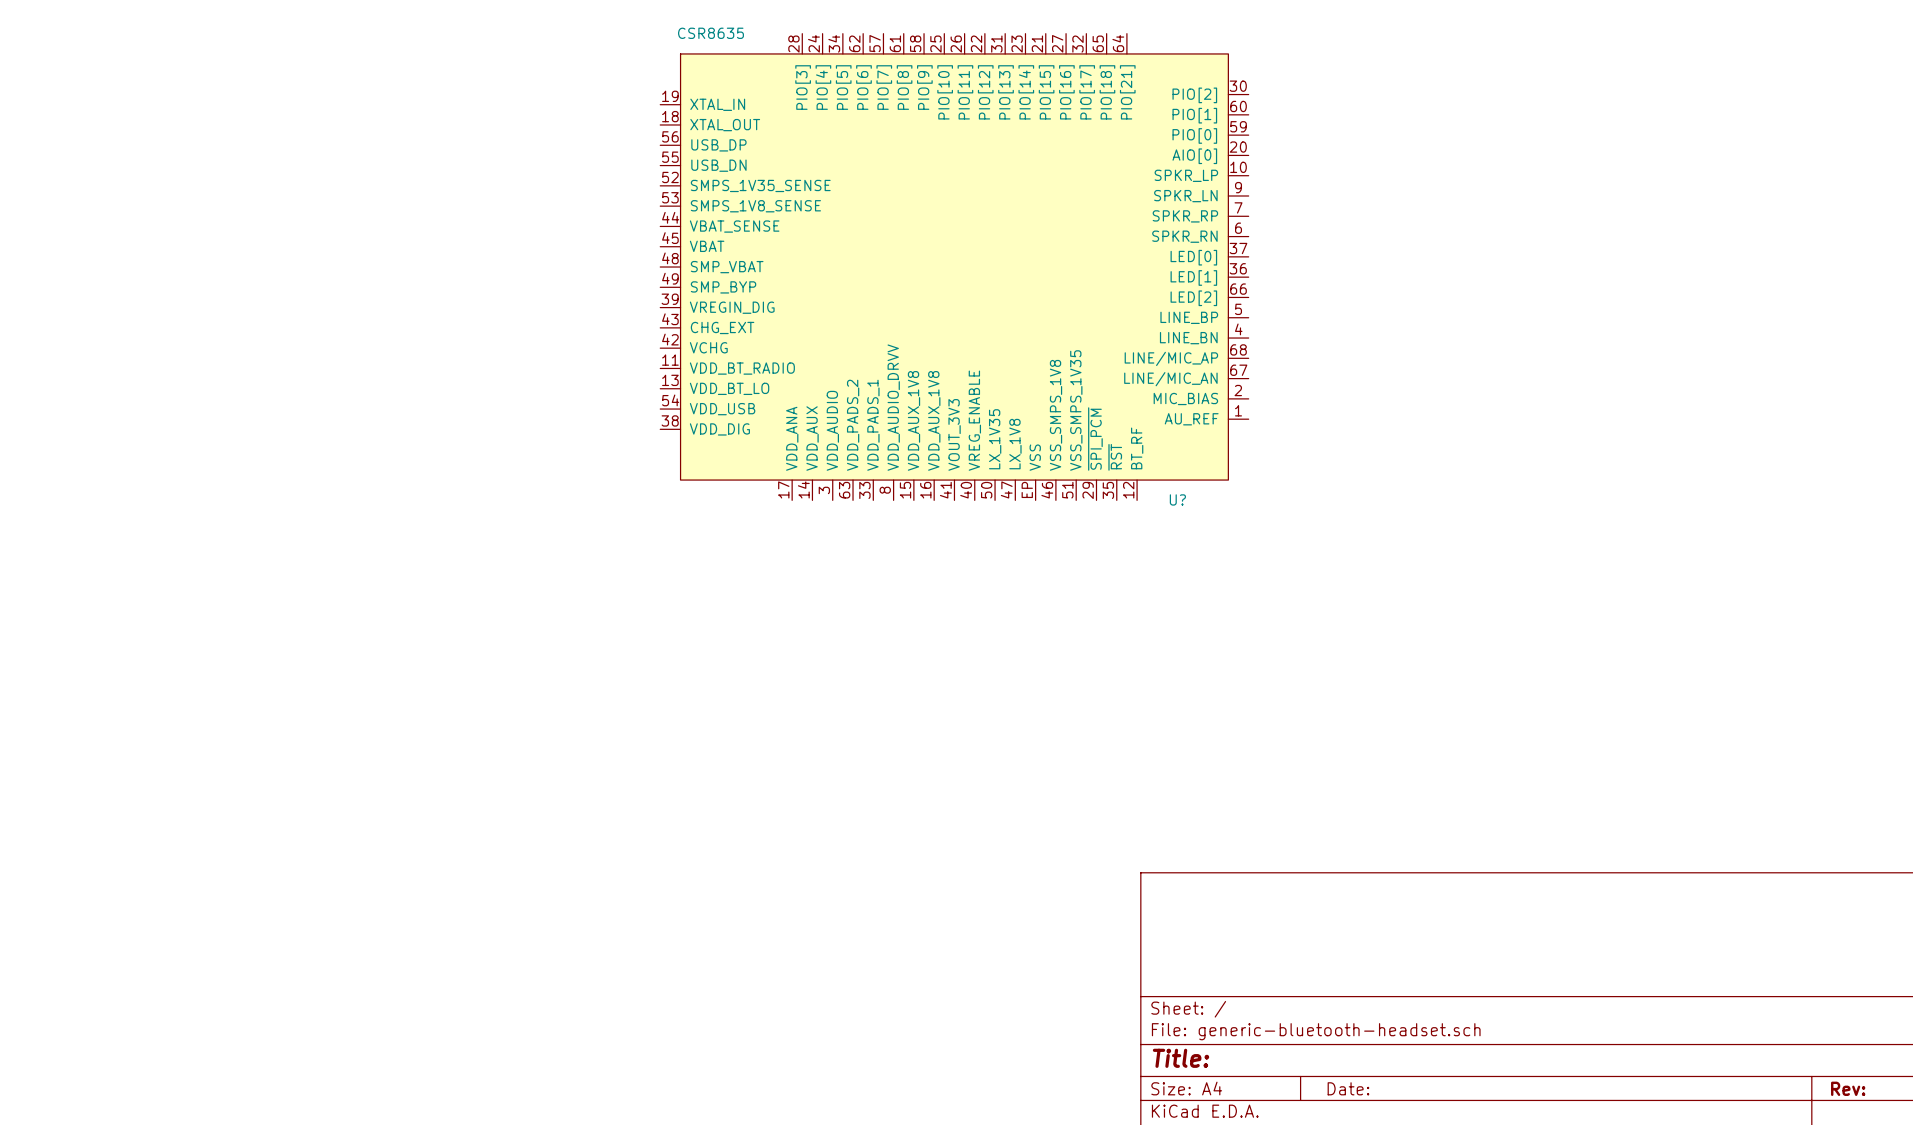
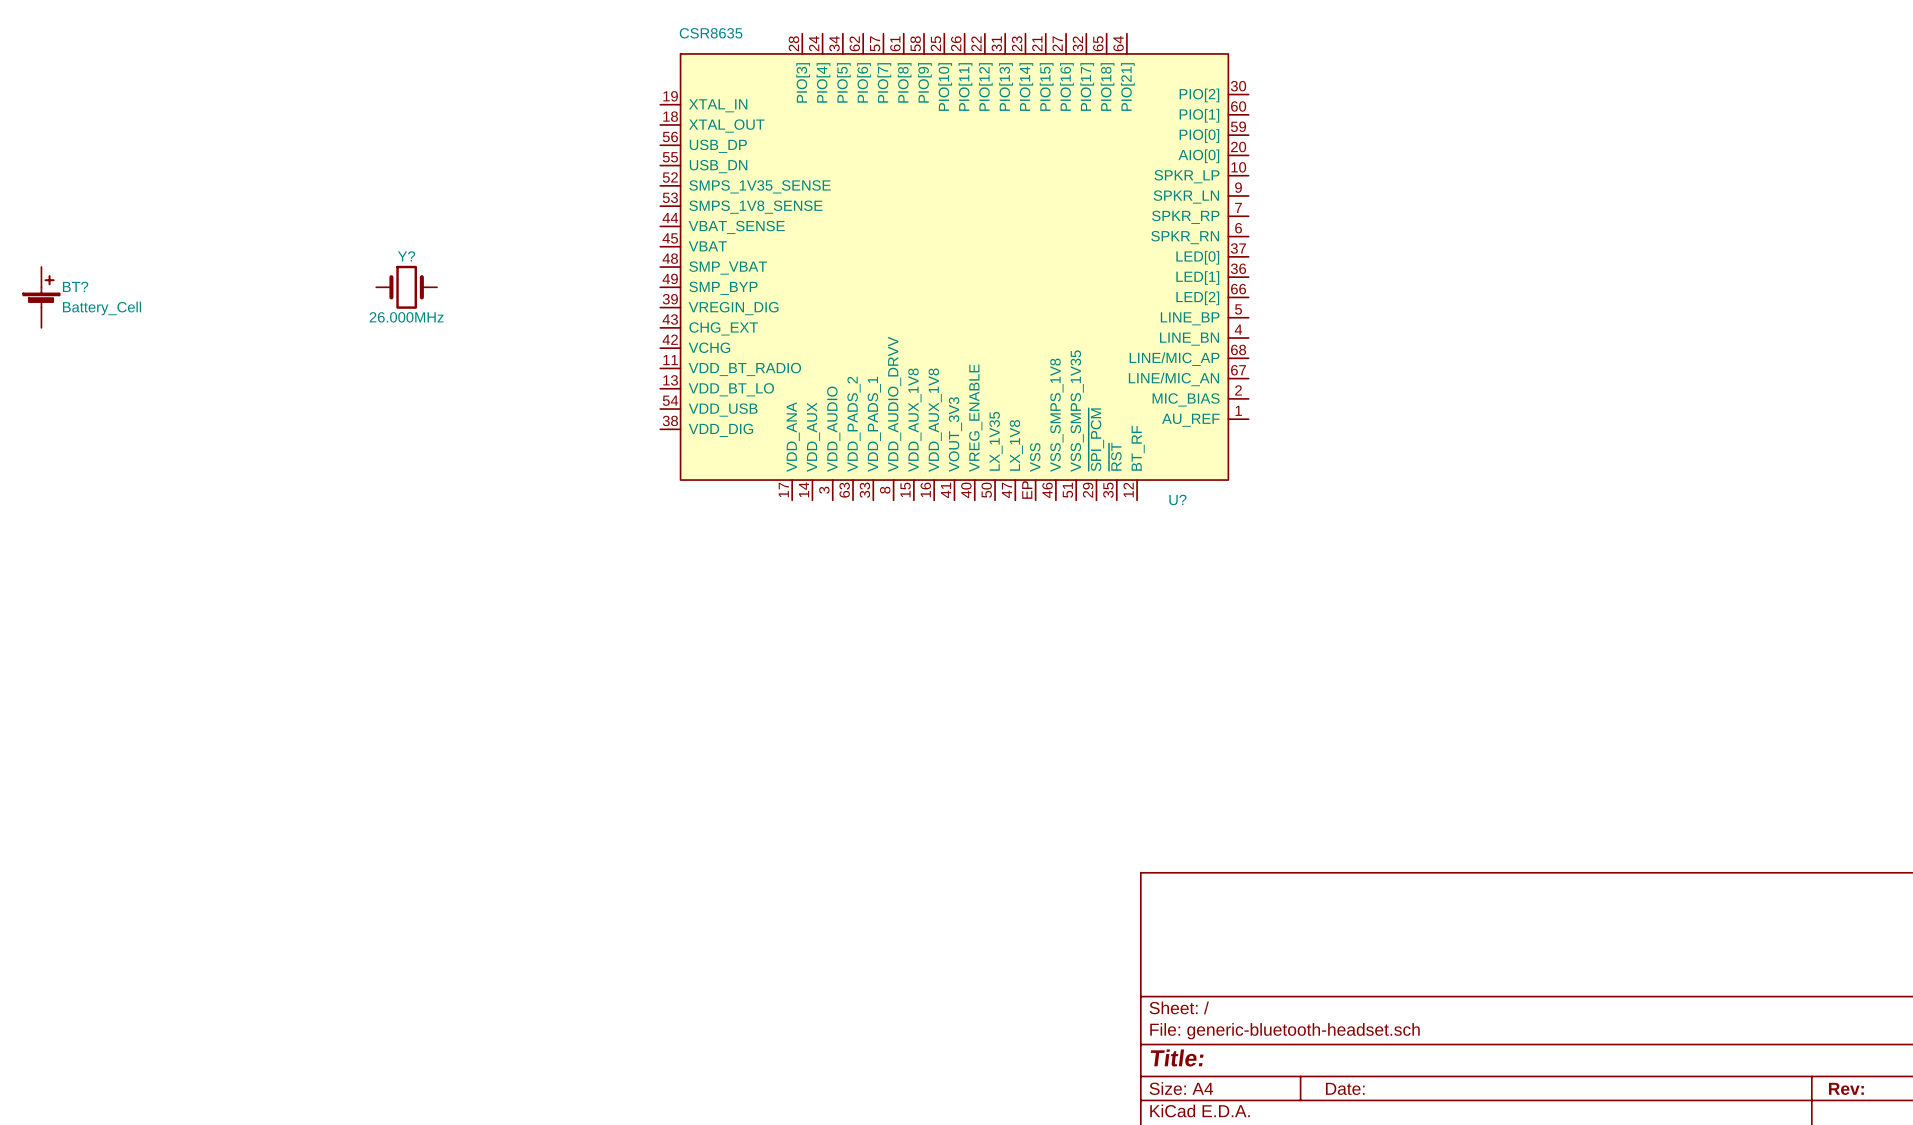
Y?: none -> 26.000MHz (406, 287)
BT?: none -> Battery_Cell (41, 297)

